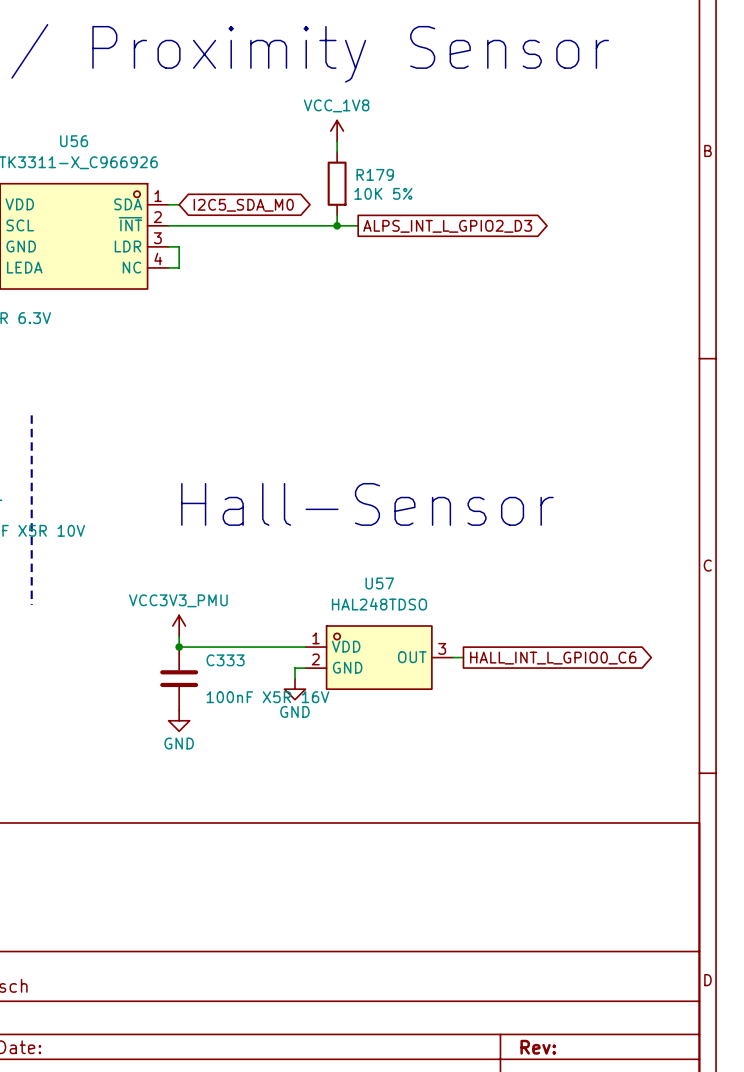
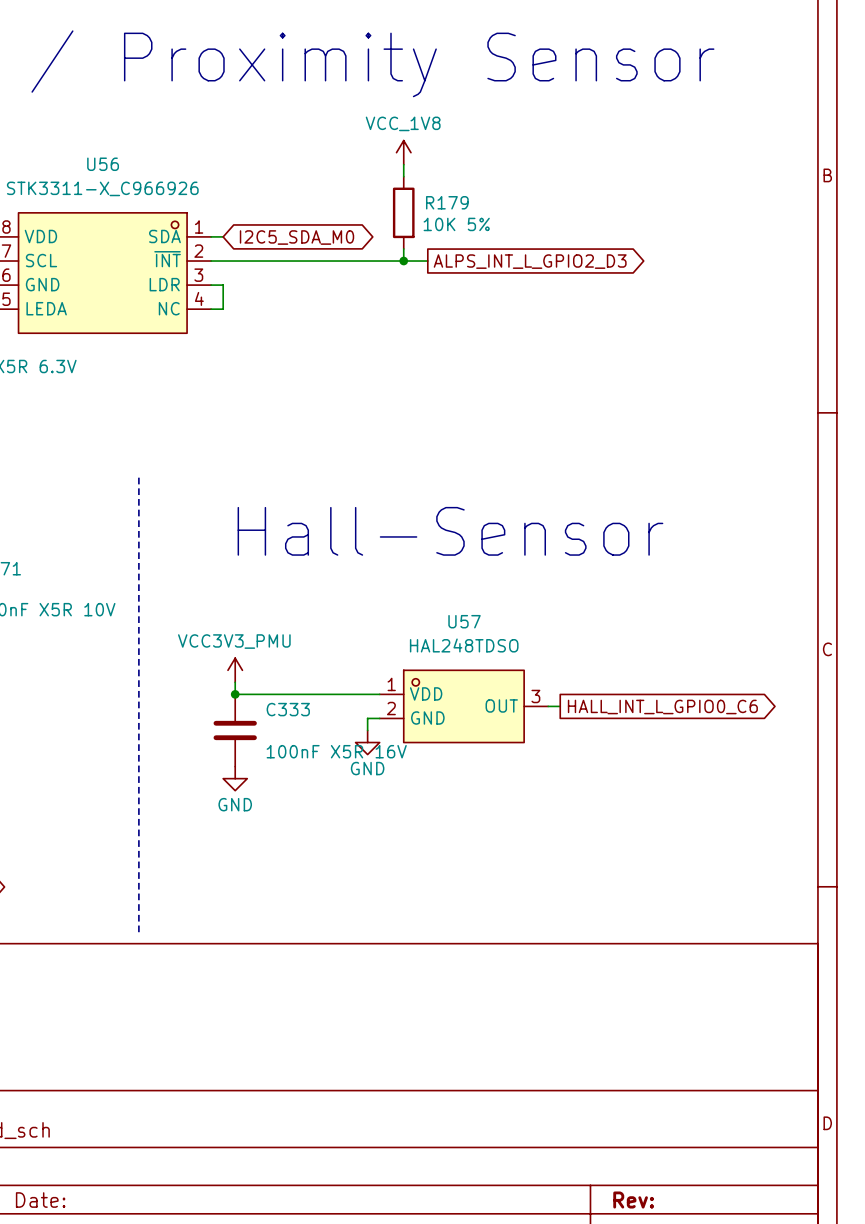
line: (31, 415) (31, 604) -> none
line: none -> (138, 477) (138, 935)
text position: Hall-Sensor (367, 504) -> Hall-Sensor (450, 531)
power symbol position: VCC3V3_PMU (179, 625) -> VCC3V3_PMU (235, 670)
wire: (179, 636) (179, 647) (305, 647) -> (235, 682) (235, 694) (379, 694)
junction position: (179, 647) -> (235, 694)
U57 position: (379, 657) -> (463, 706)
wire: (452, 657) (463, 657) -> (548, 706) (560, 706)
global label position: HALL_INT_L_GPIO0_C6 (553, 658) -> HALL_INT_L_GPIO0_C6 (662, 706)
wire: (305, 668) (294, 668) (294, 678) -> (379, 718) (367, 718) (367, 730)
C333 position: (179, 678) -> (235, 730)
power symbol position: GND (294, 689) -> GND (367, 742)
power symbol position: GND (179, 720) -> GND (235, 778)

